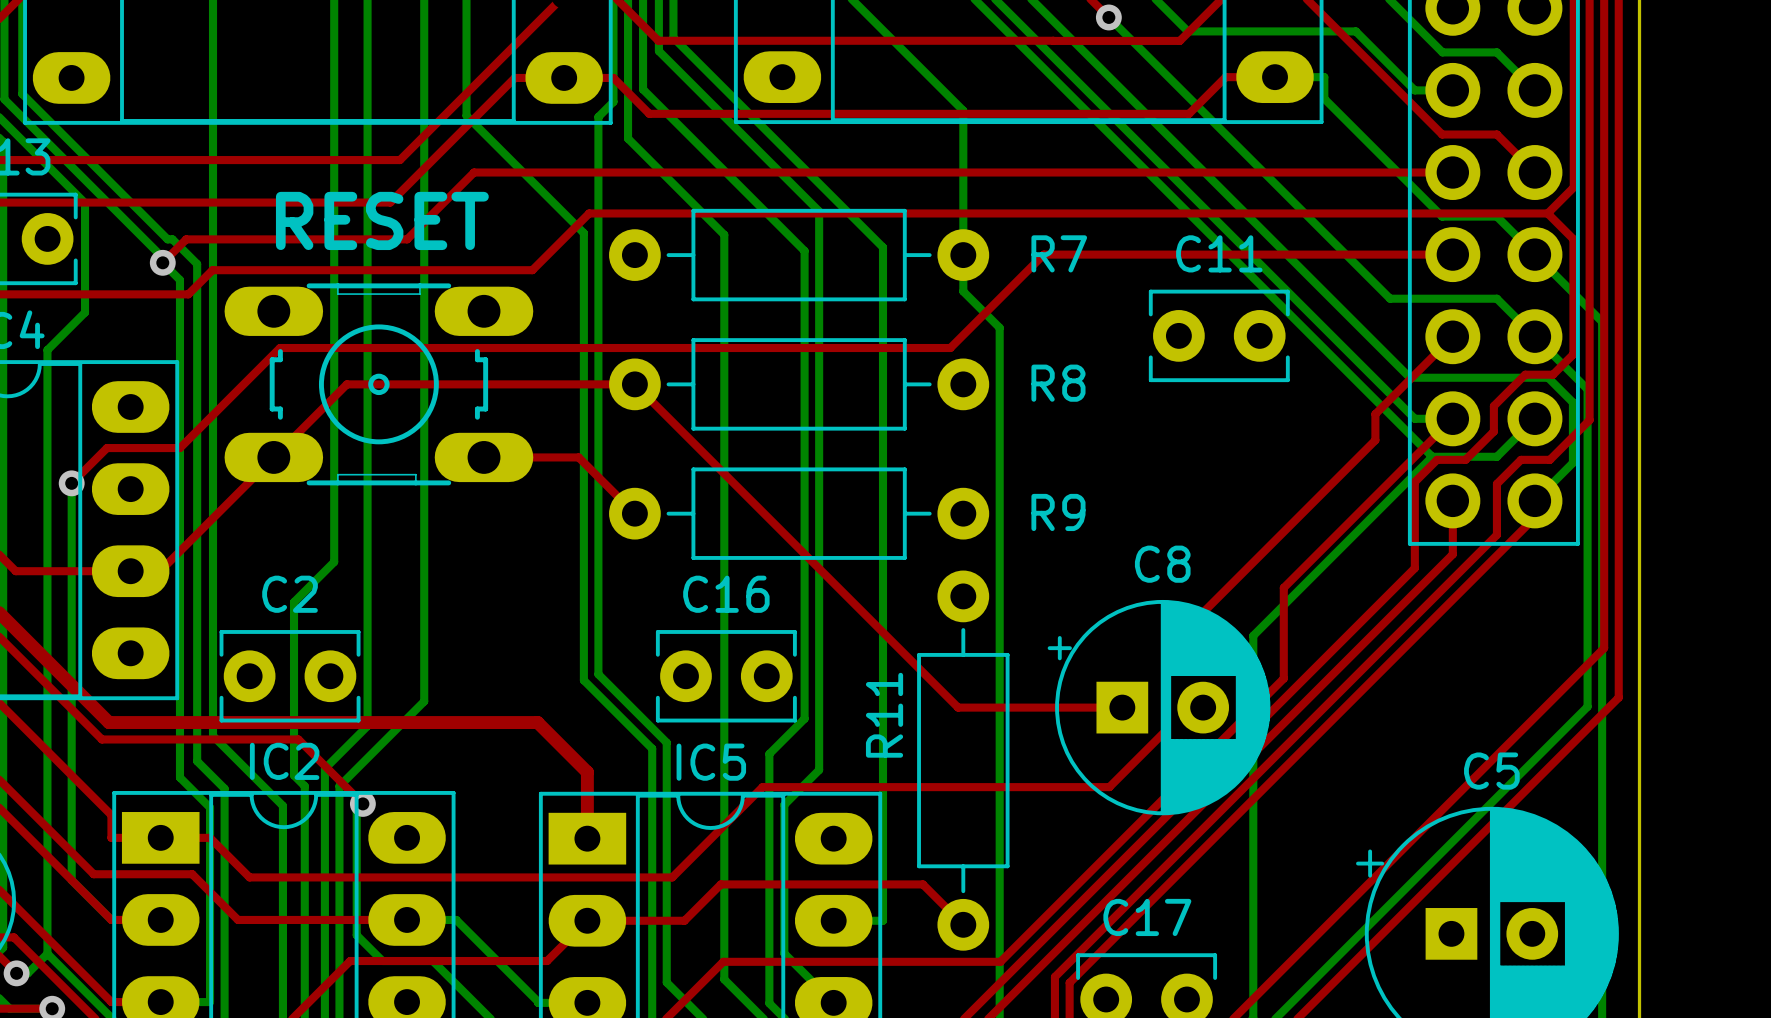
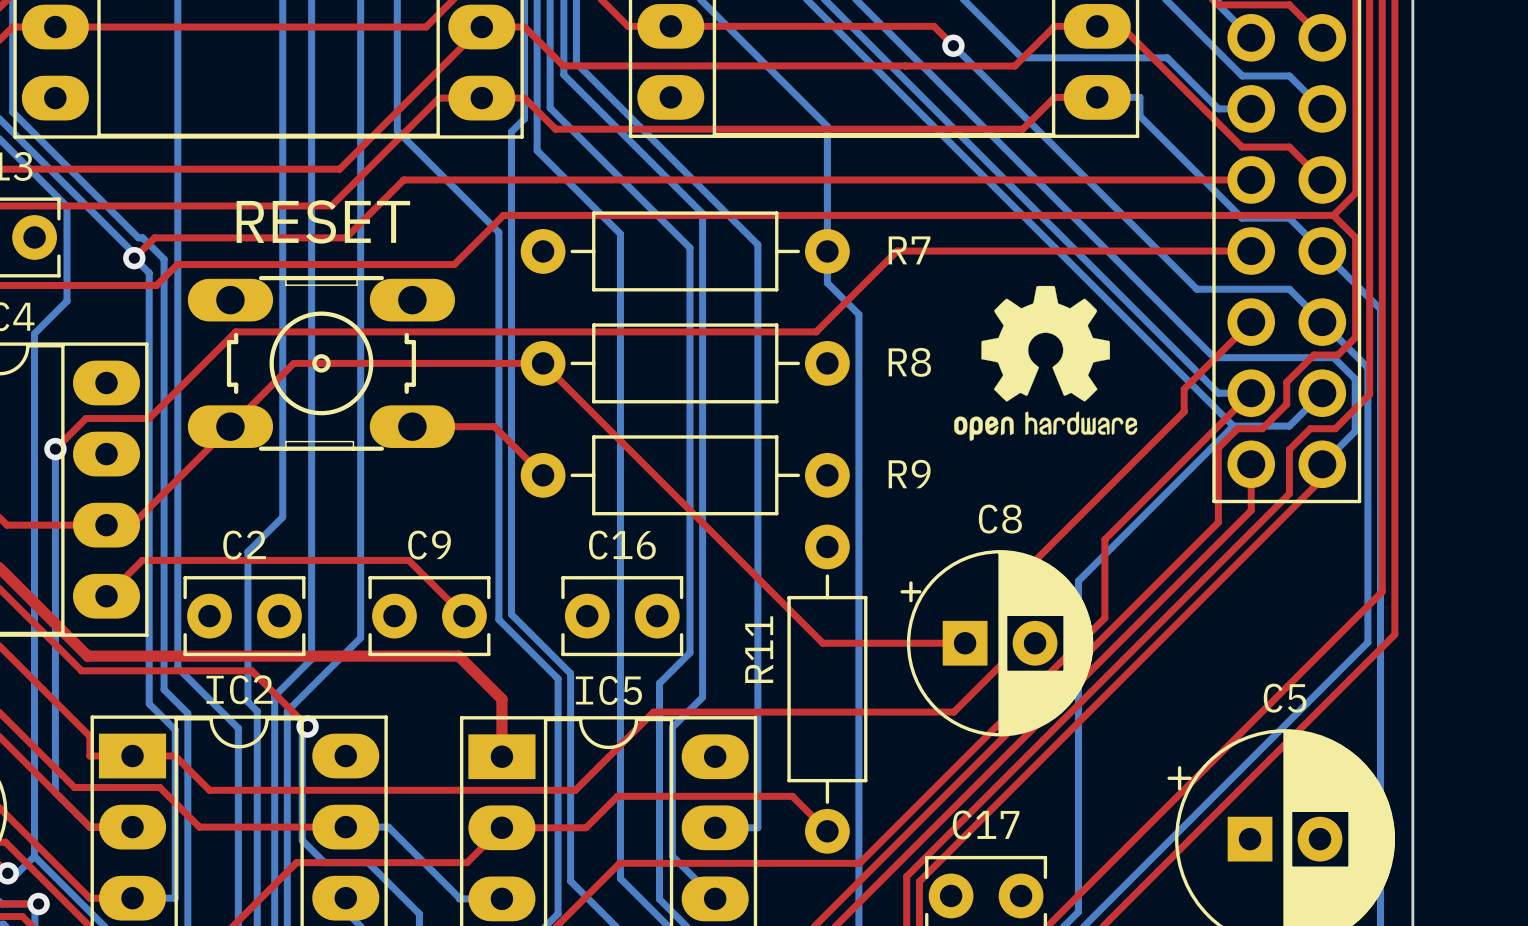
drawing: none -> [954, 285, 1138, 441]
C11: (1219, 335) -> none
top track: none -> (106, 596) (142, 560) (408, 560) (464, 616)
C9: none -> (429, 616)

